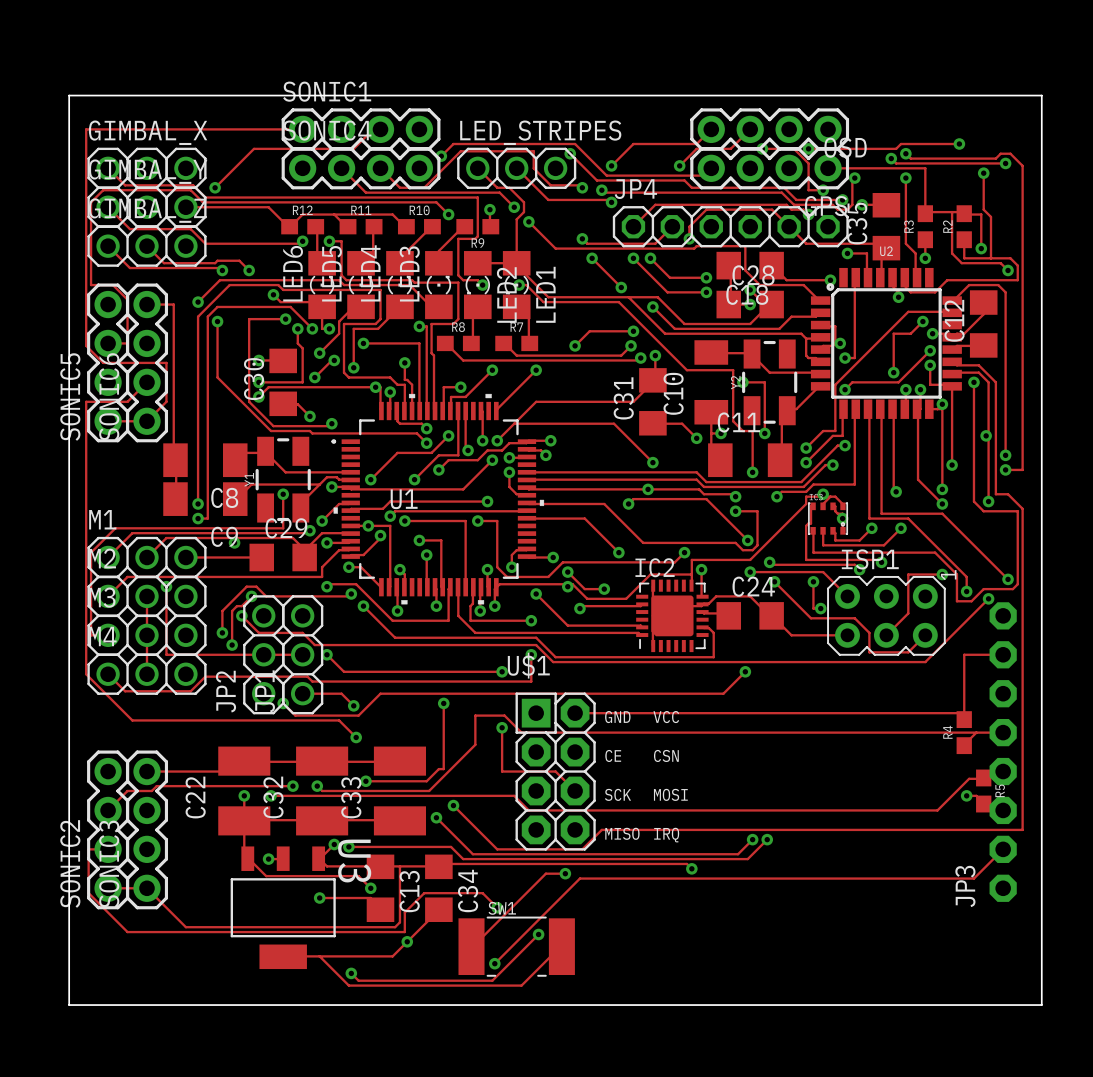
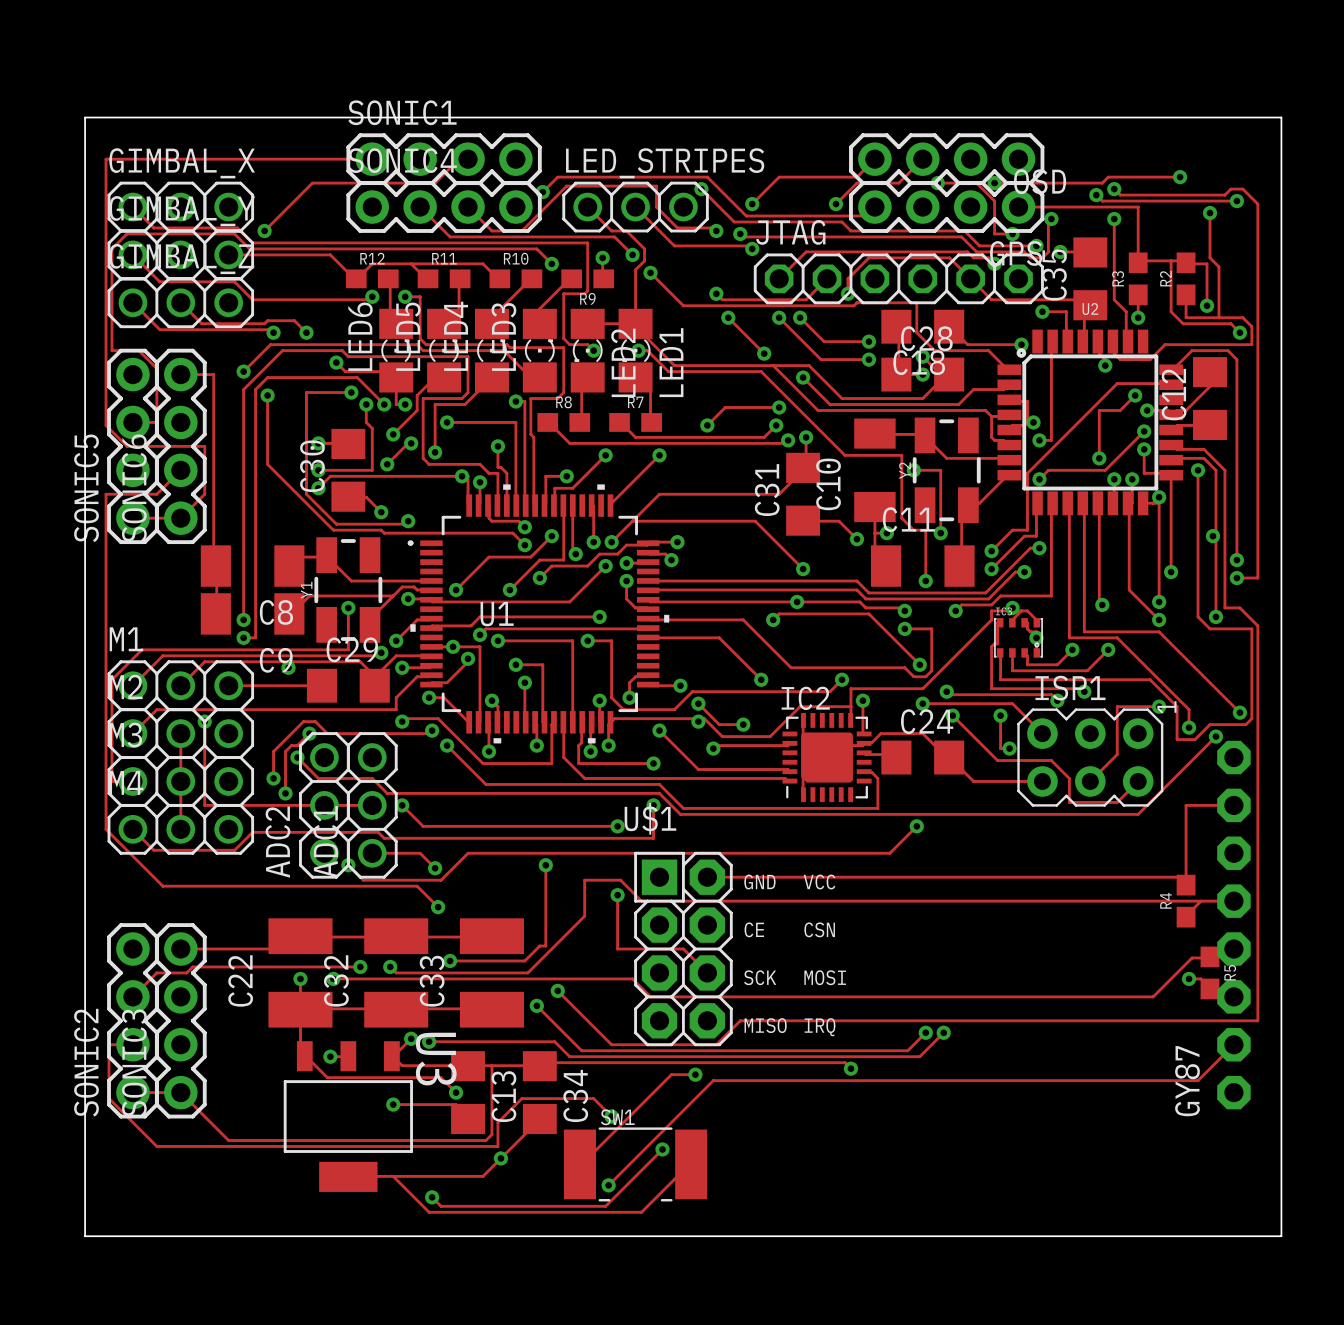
JP4 name: JP4 (635, 189) -> JTAG (790, 232)
JP2 name: JP2 (226, 691) -> ADC2 (277, 842)
JP1 name: JP1 (265, 691) -> ADC1 (325, 841)
JP3 name: JP3 (965, 886) -> GY87 (1187, 1081)

